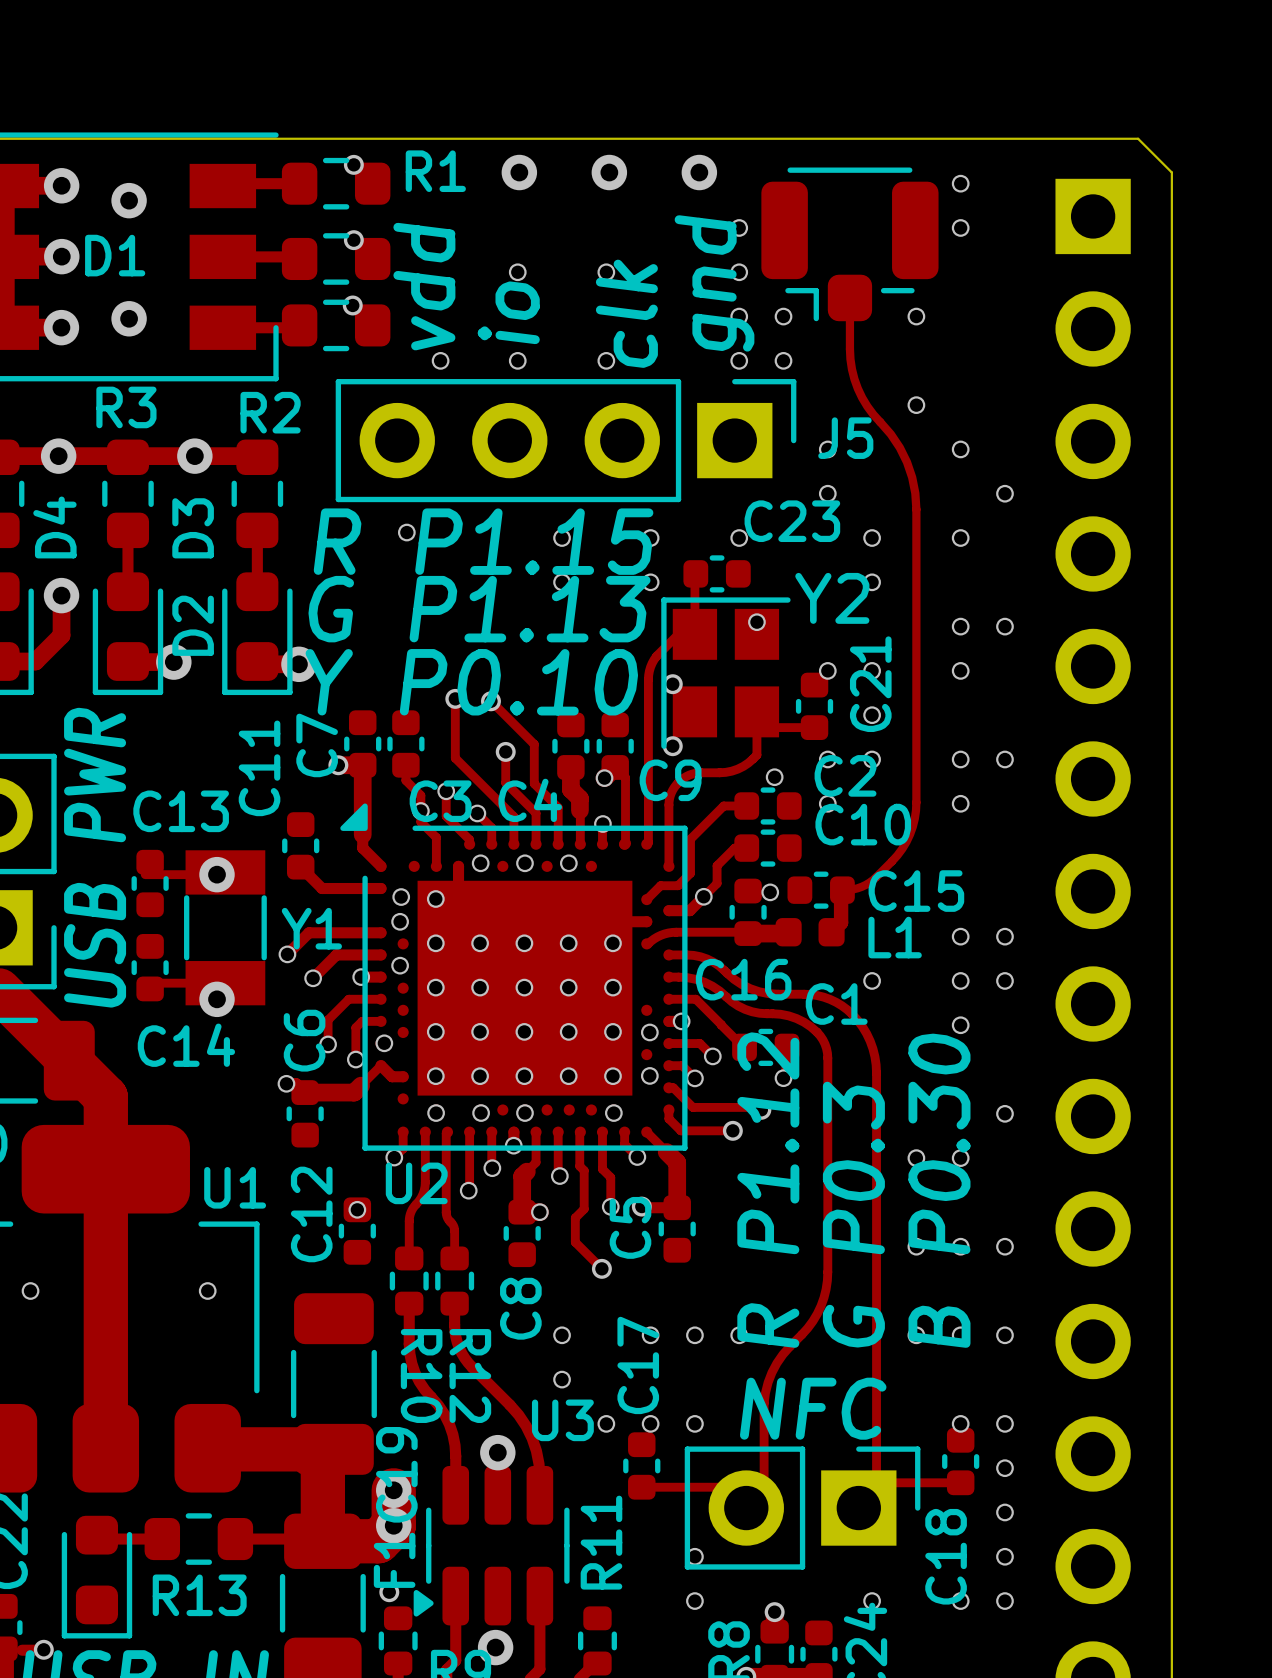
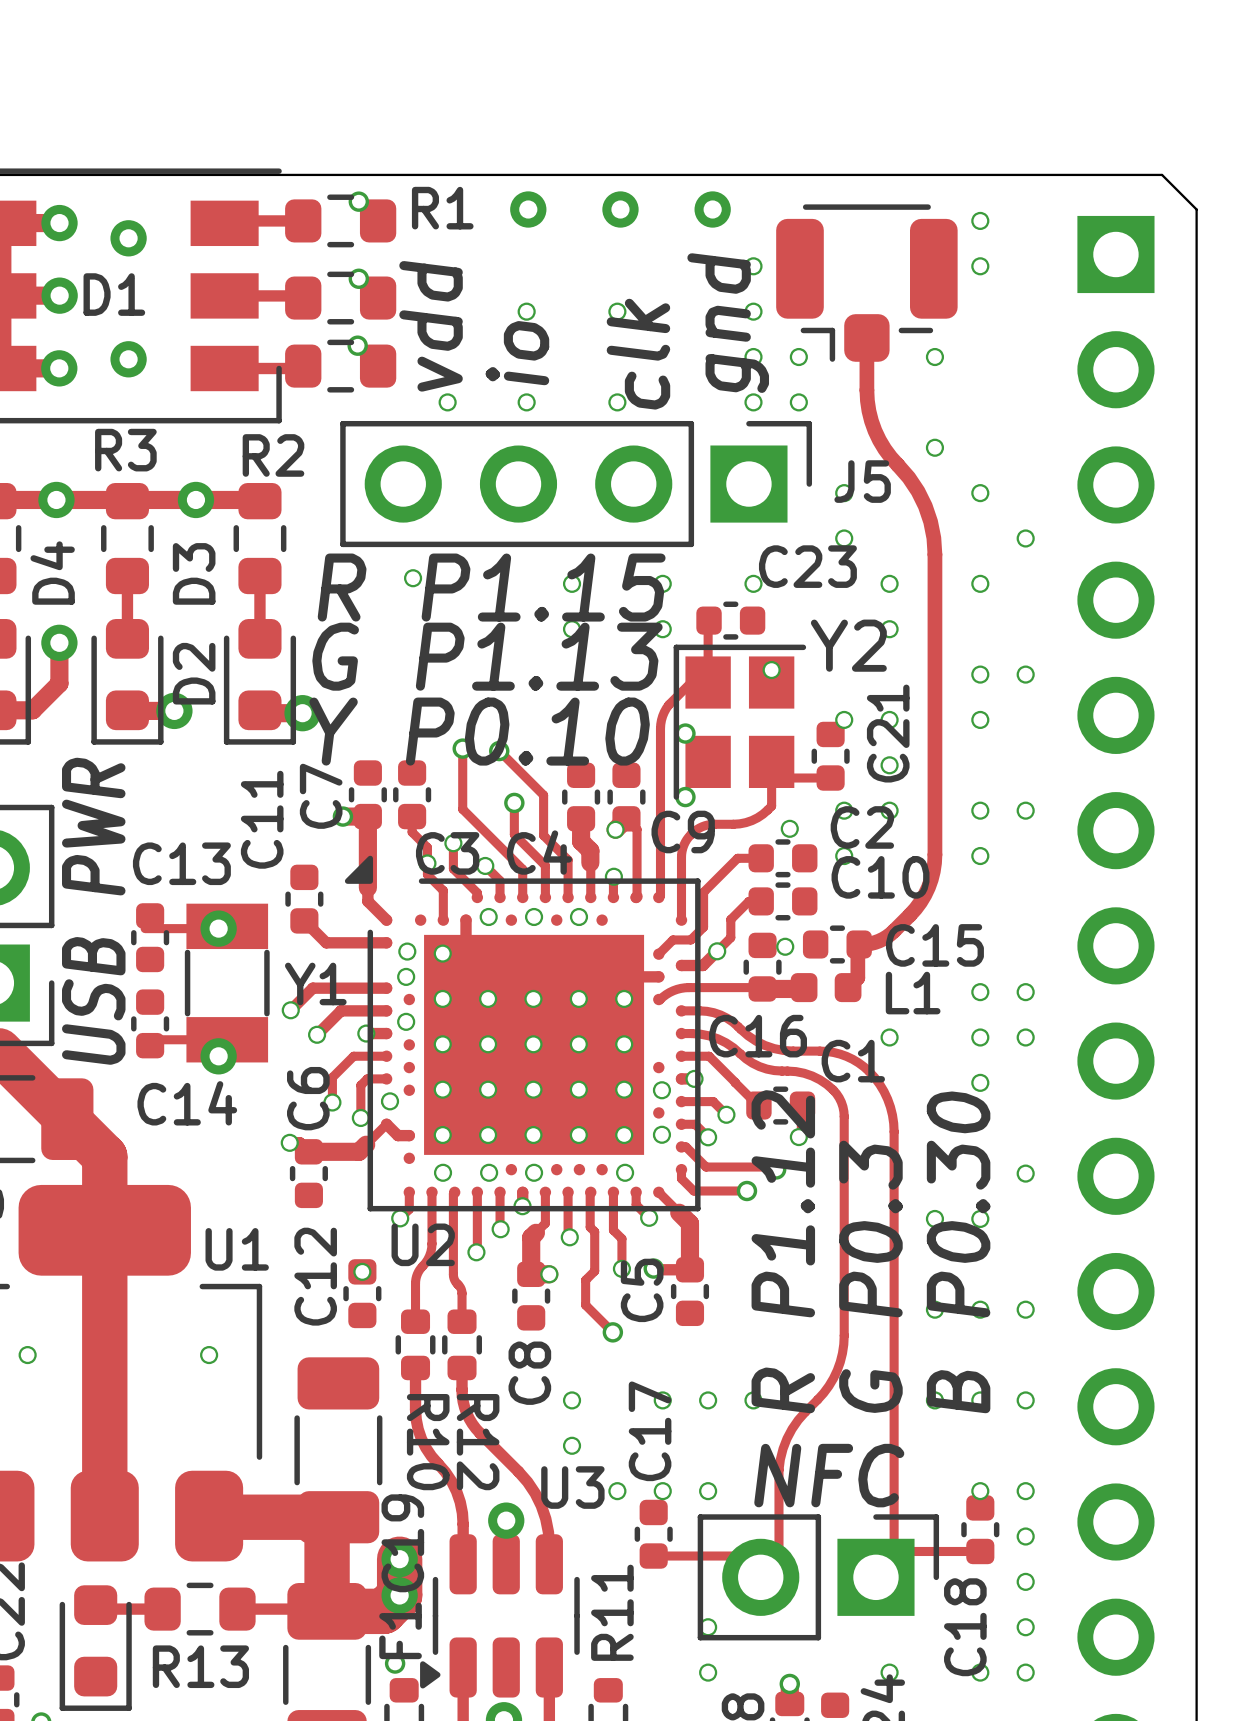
track width: thin (849, 297) (850, 359) (854, 379) (867, 406) (899, 447) (912, 477) (915, 493) (916, 802) (914, 818) (910, 834) (897, 855) (869, 882) (857, 888) (842, 890) -> thick (866, 337) (867, 400) (871, 421) (884, 449) (918, 491) (930, 521) (933, 538) (934, 854) (933, 871) (928, 887) (915, 908) (886, 936) (874, 942) (859, 944)

